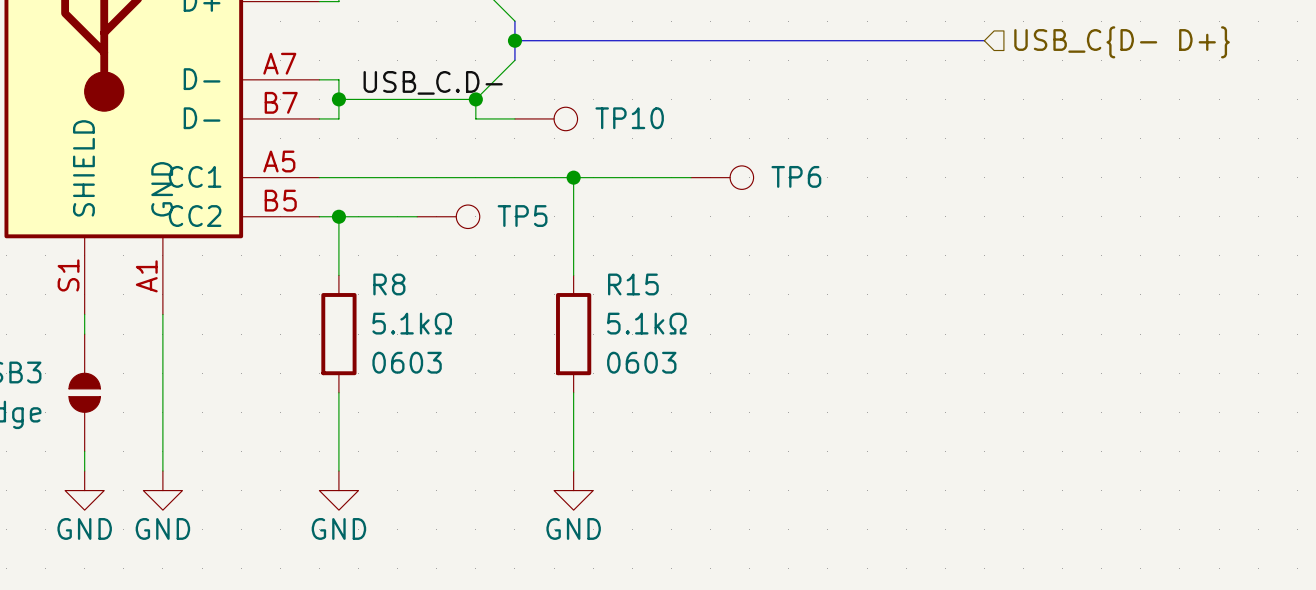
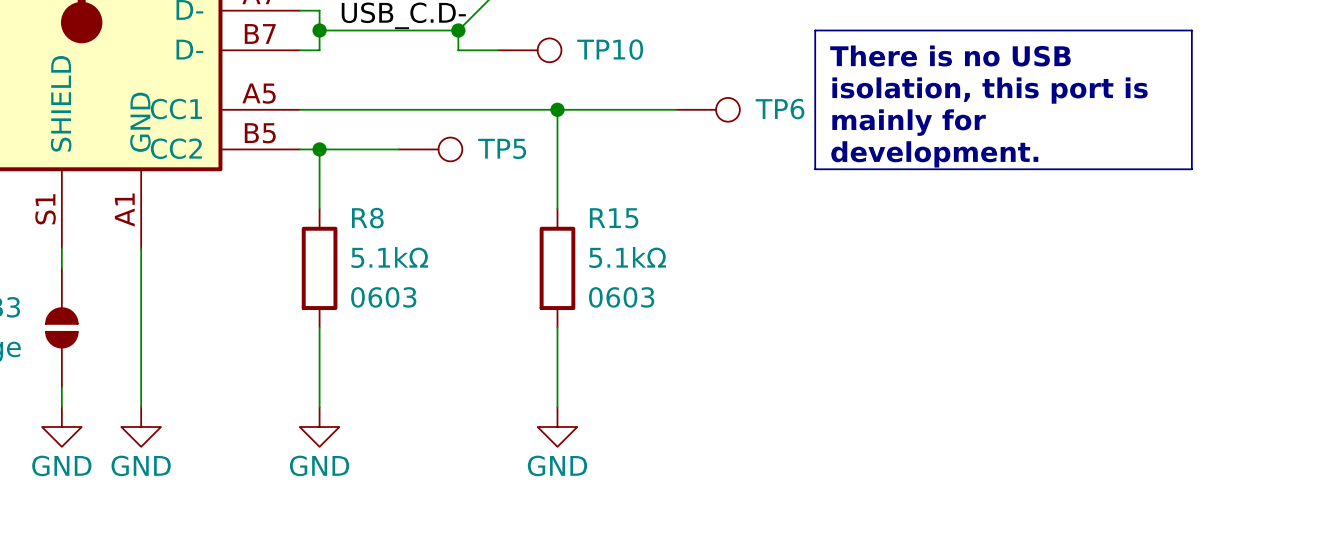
line: none -> (815, 30) (1191, 30) (1191, 169) (815, 169) (815, 30)
text: none -> There is no USB (950, 56)
text: none -> isolation, this port is (990, 90)
text: none -> mainly for (909, 122)
text: none -> development. (934, 154)

